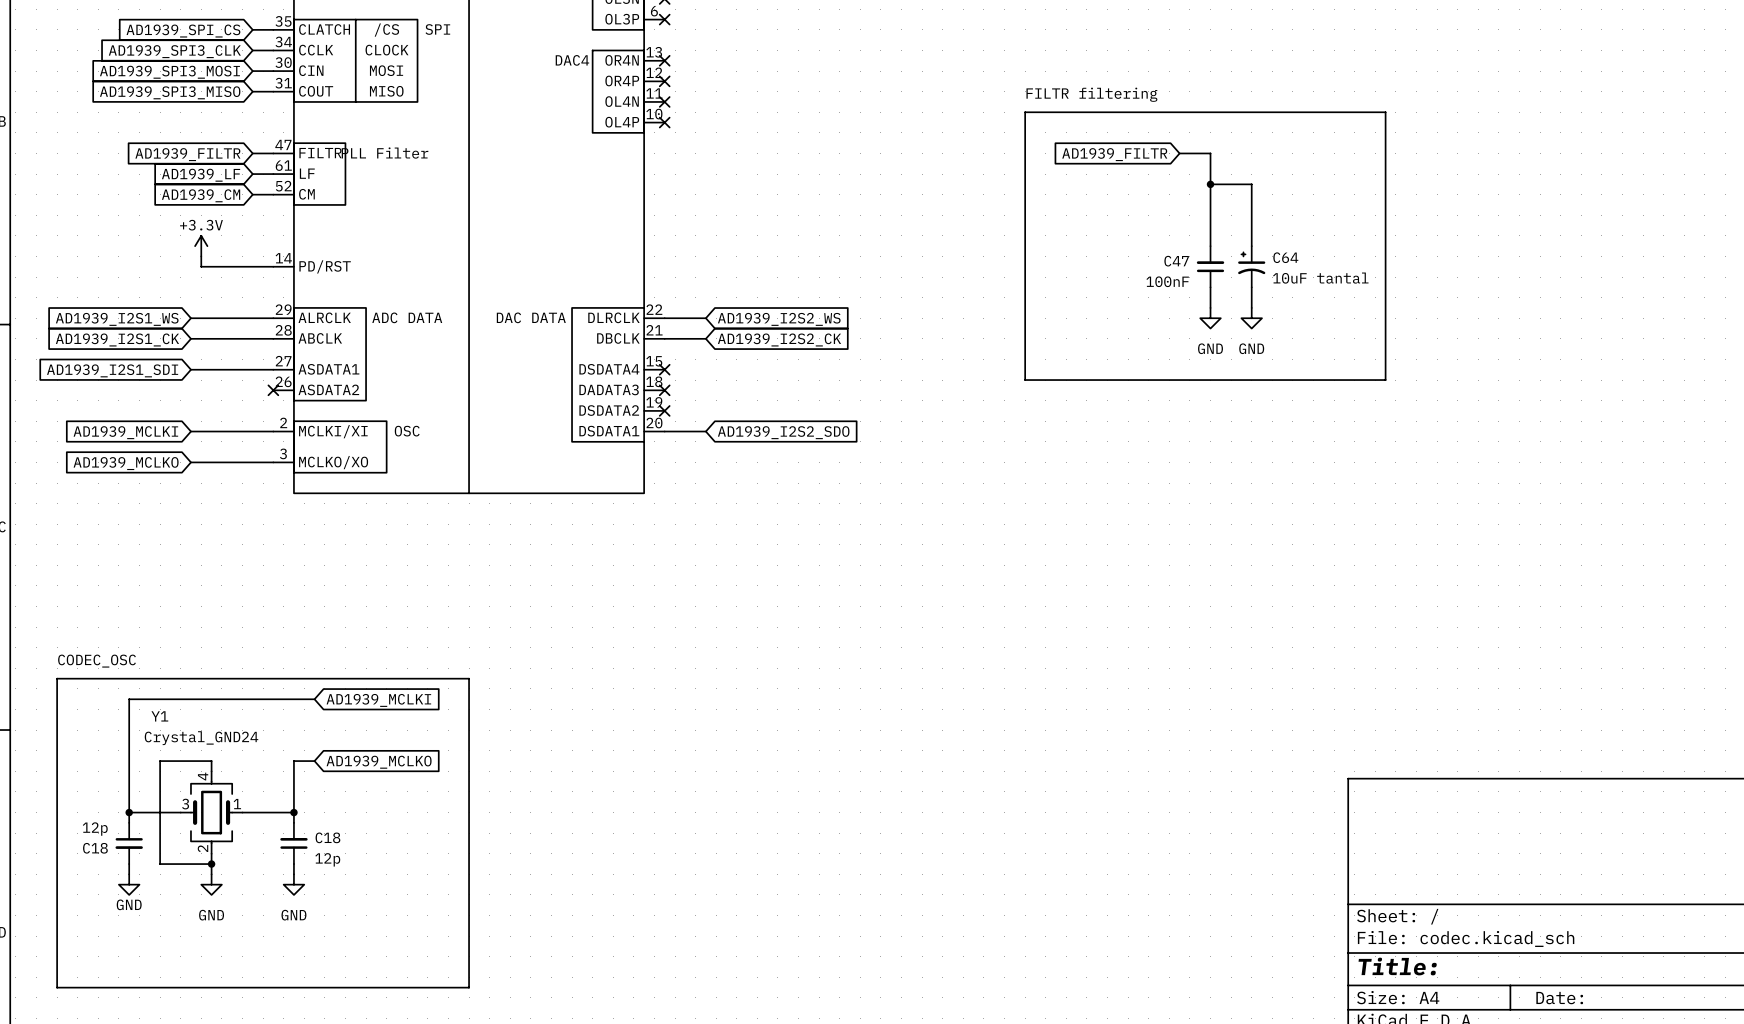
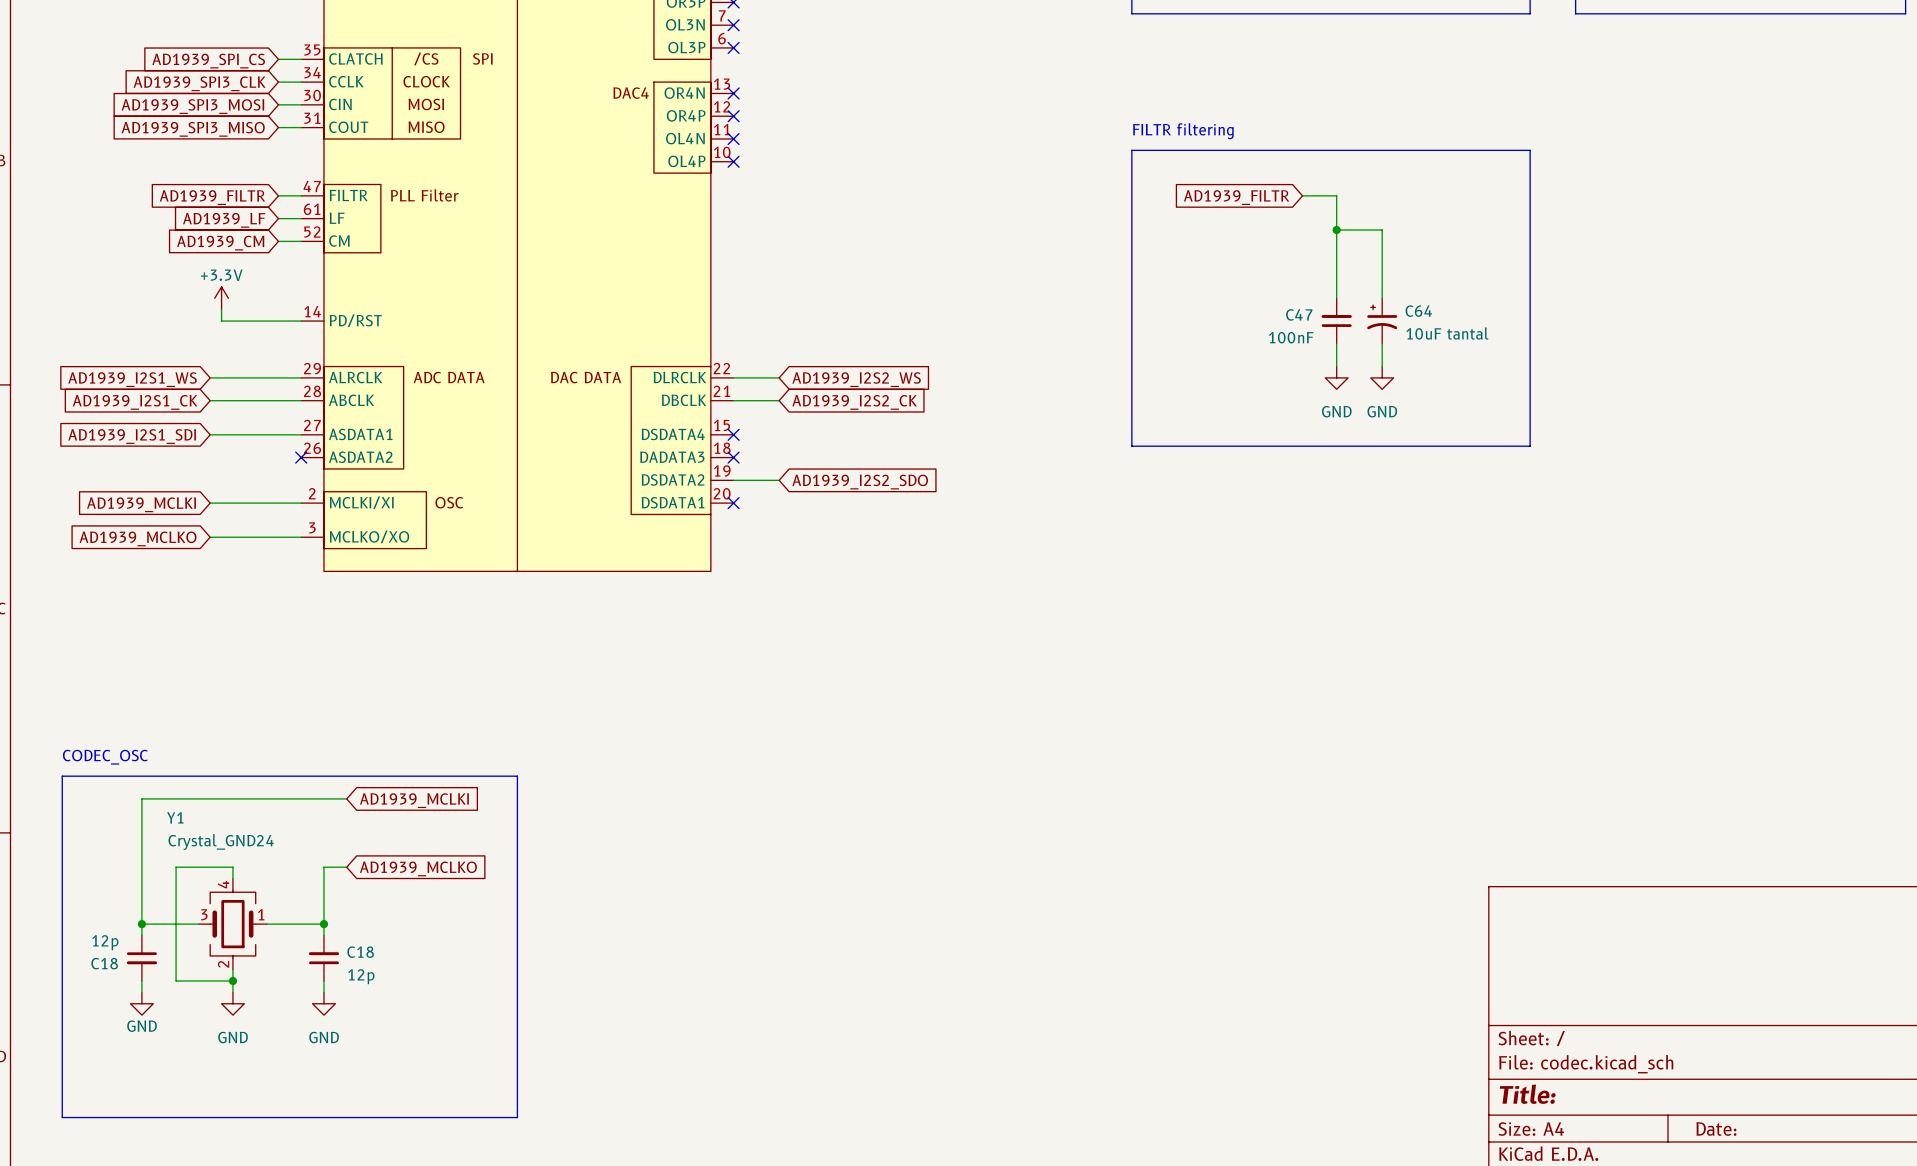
no-connect mark position: (664, 410) -> (733, 503)
wire: (664, 431) (705, 431) -> (733, 480) (779, 480)
global label position: AD1939_I2S2_SDO (783, 432) -> AD1939_I2S2_SDO (860, 482)

